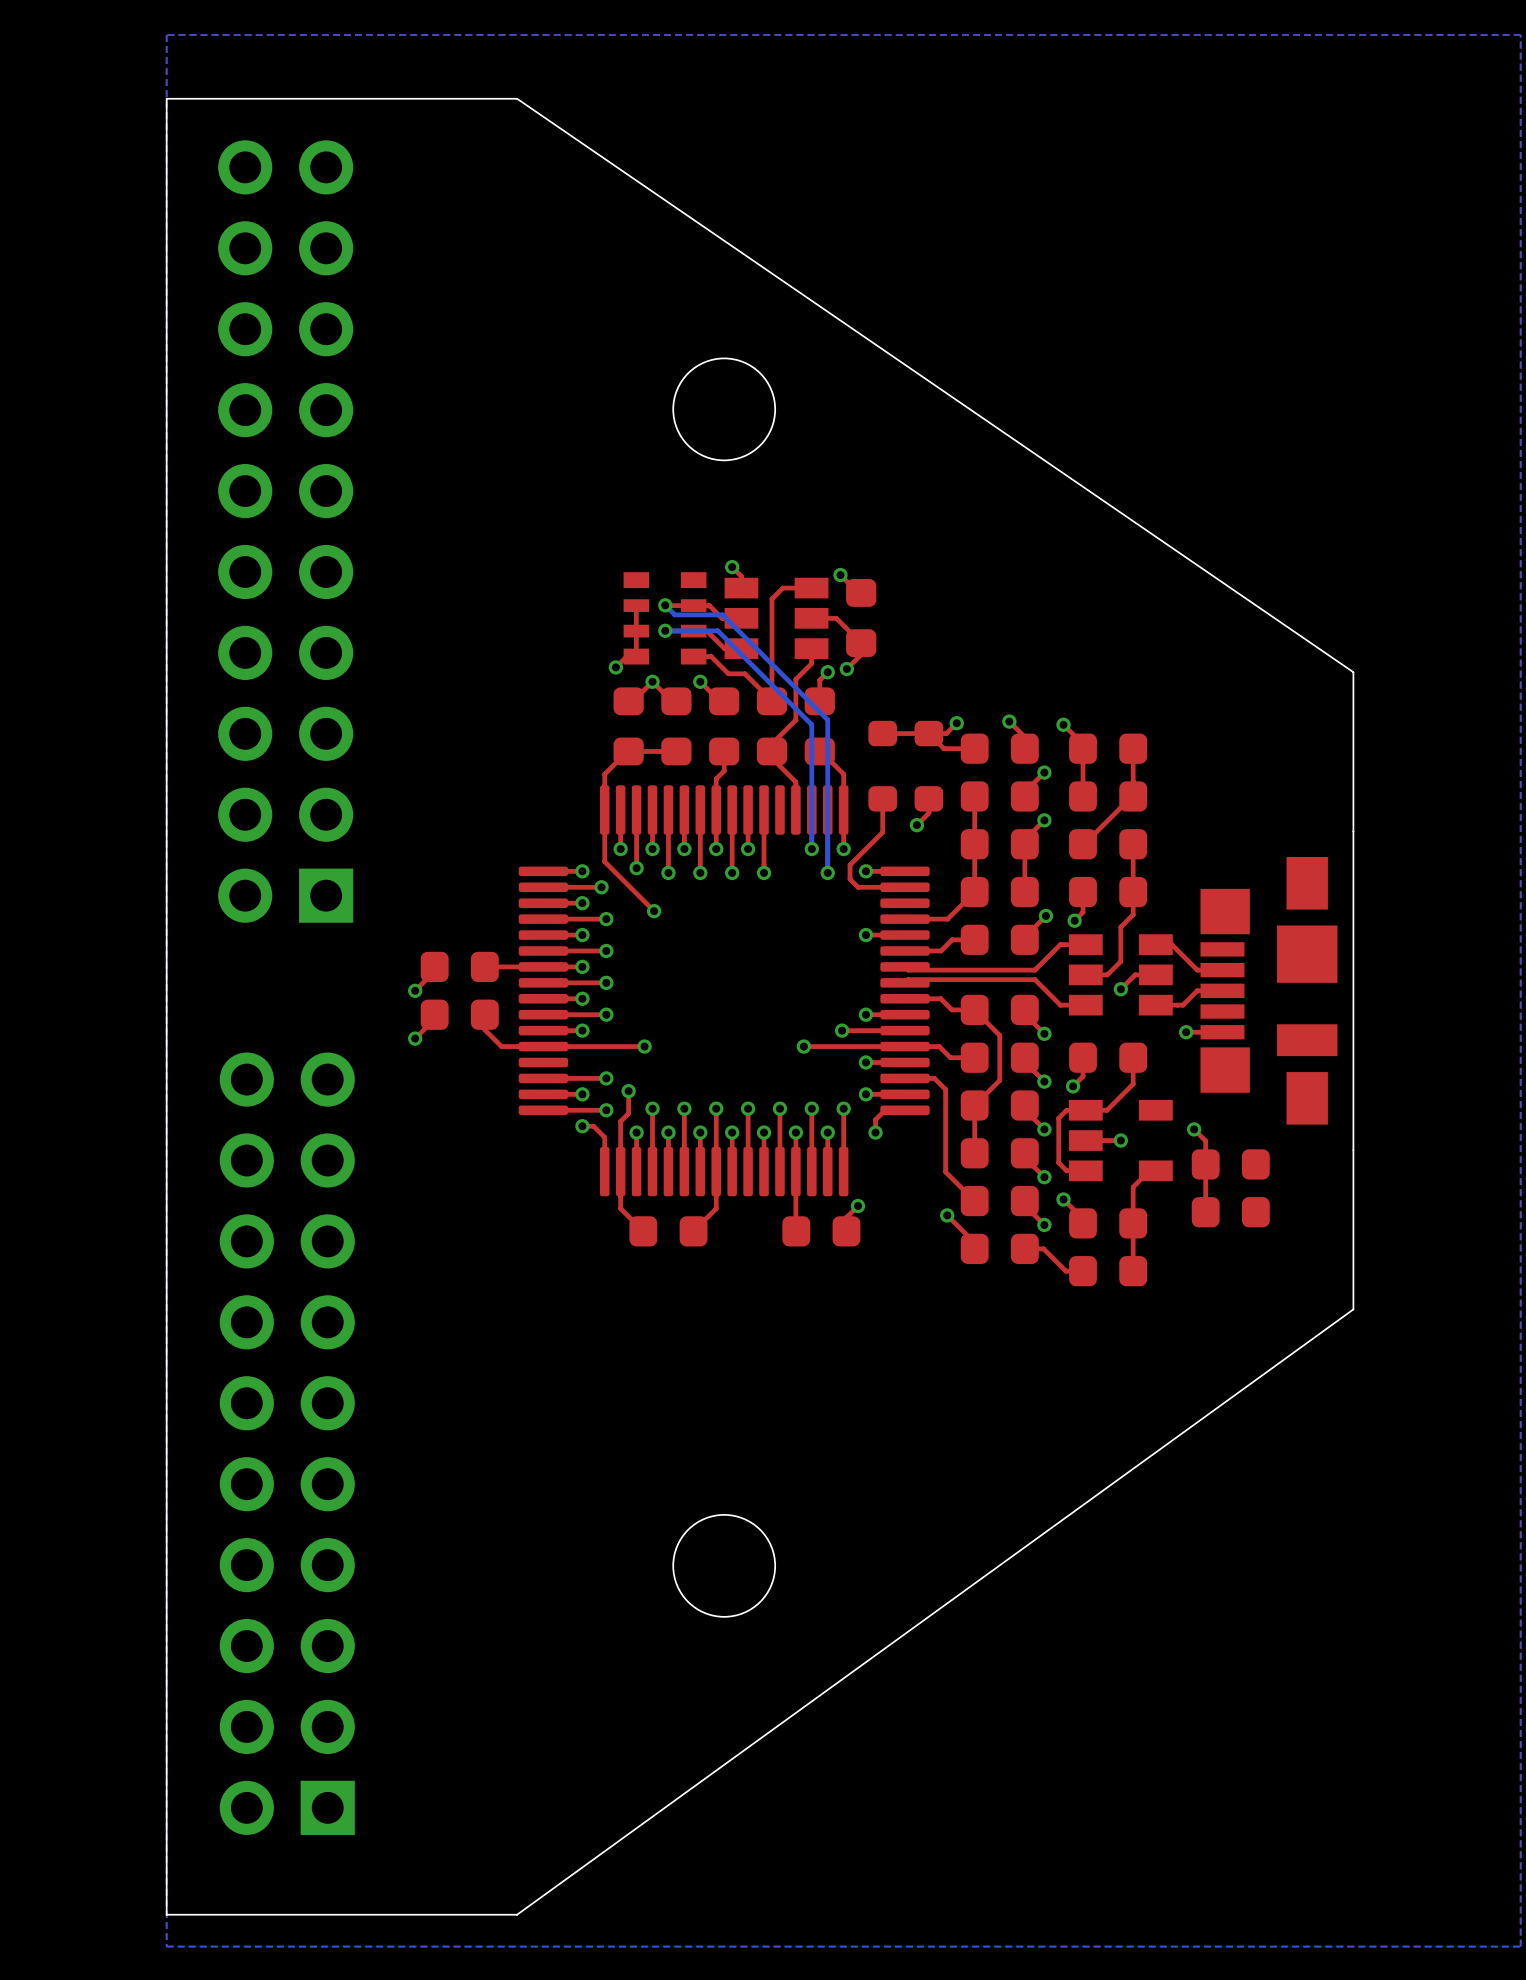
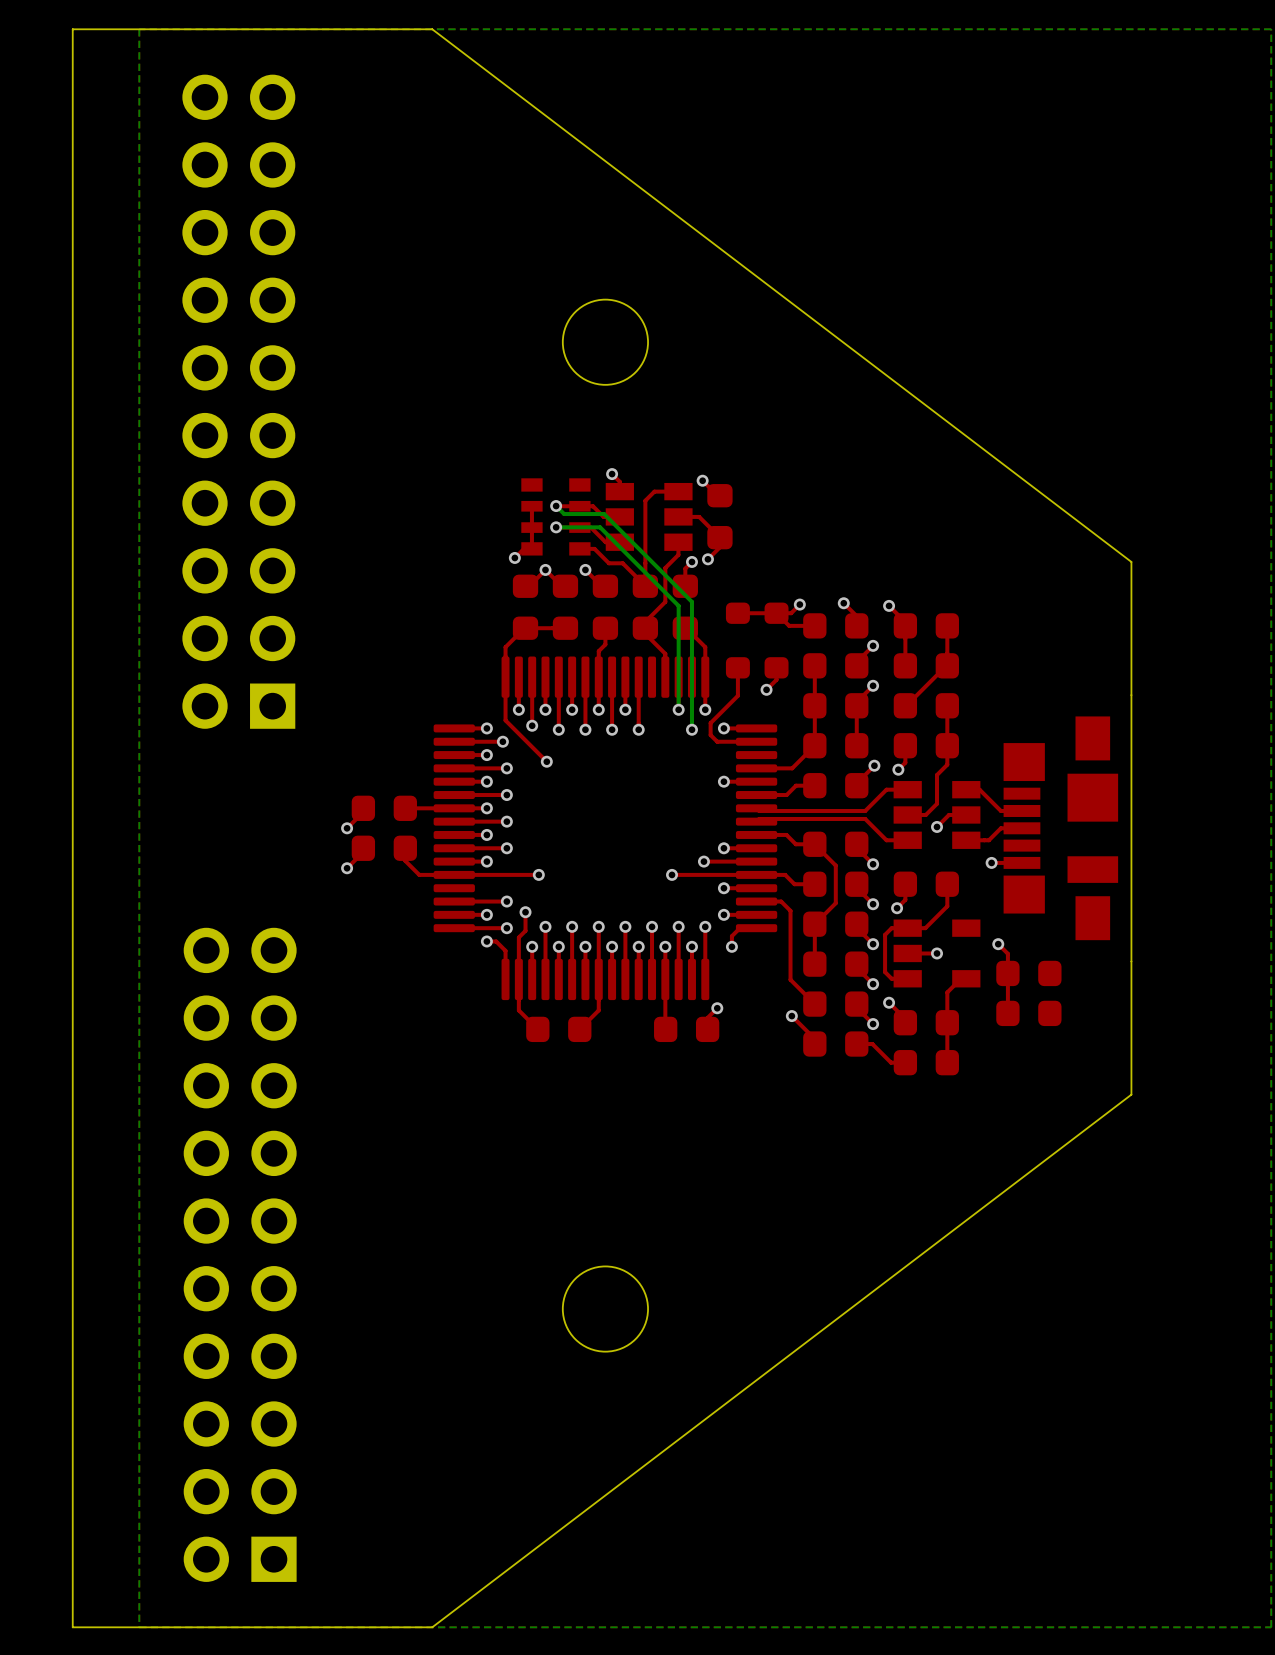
part position: (285, 531) -> (238, 401)
board edge: (1353, 672) (517, 98) (166, 98) (166, 1914) (517, 1914) (1353, 1309) -> (1131, 561) (432, 29) (72, 29) (72, 1627) (432, 1627) (1131, 1094)
part position: (287, 1443) -> (240, 1254)

